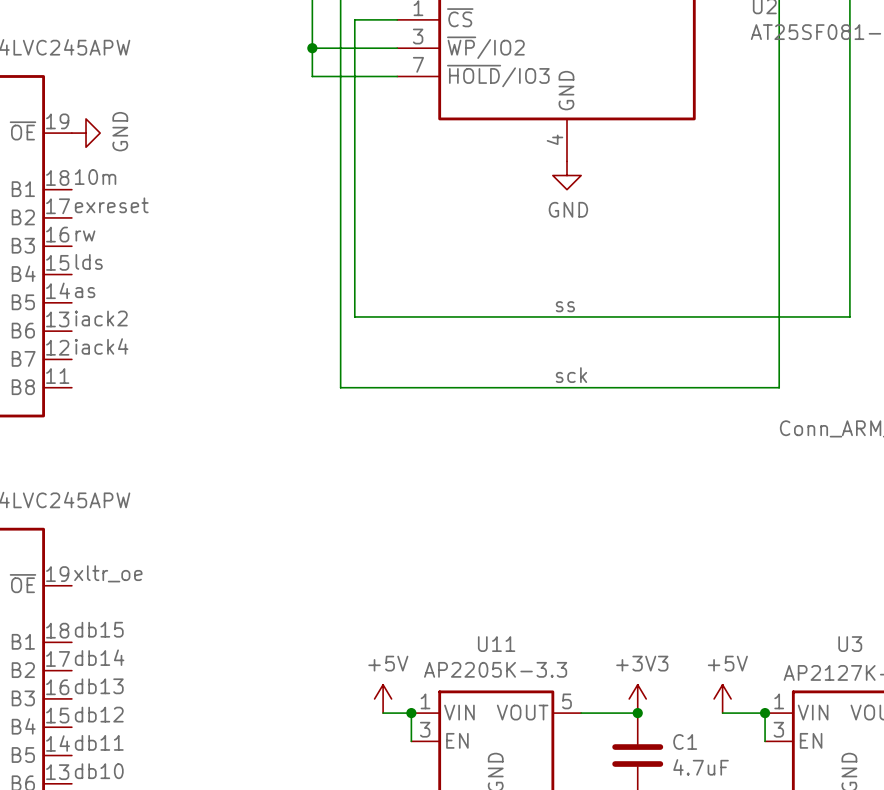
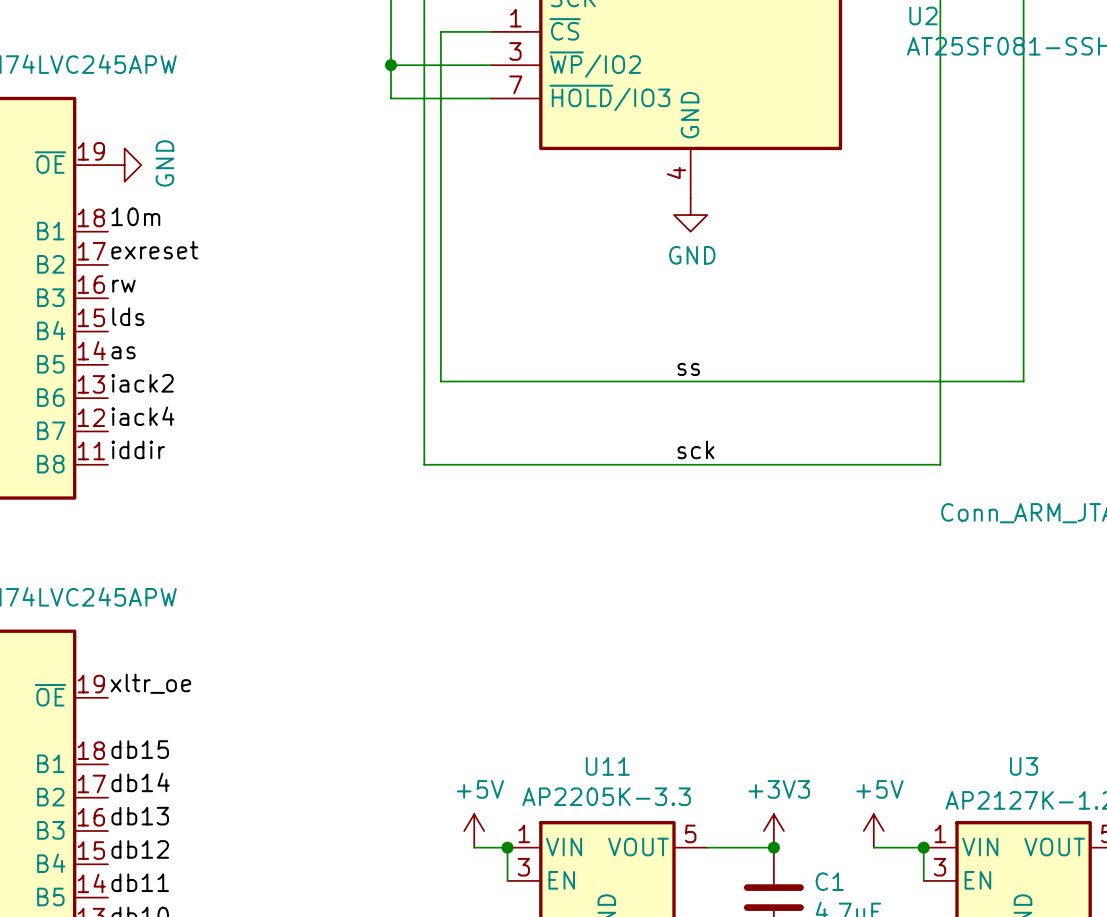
label: none -> iddir (138, 449)

